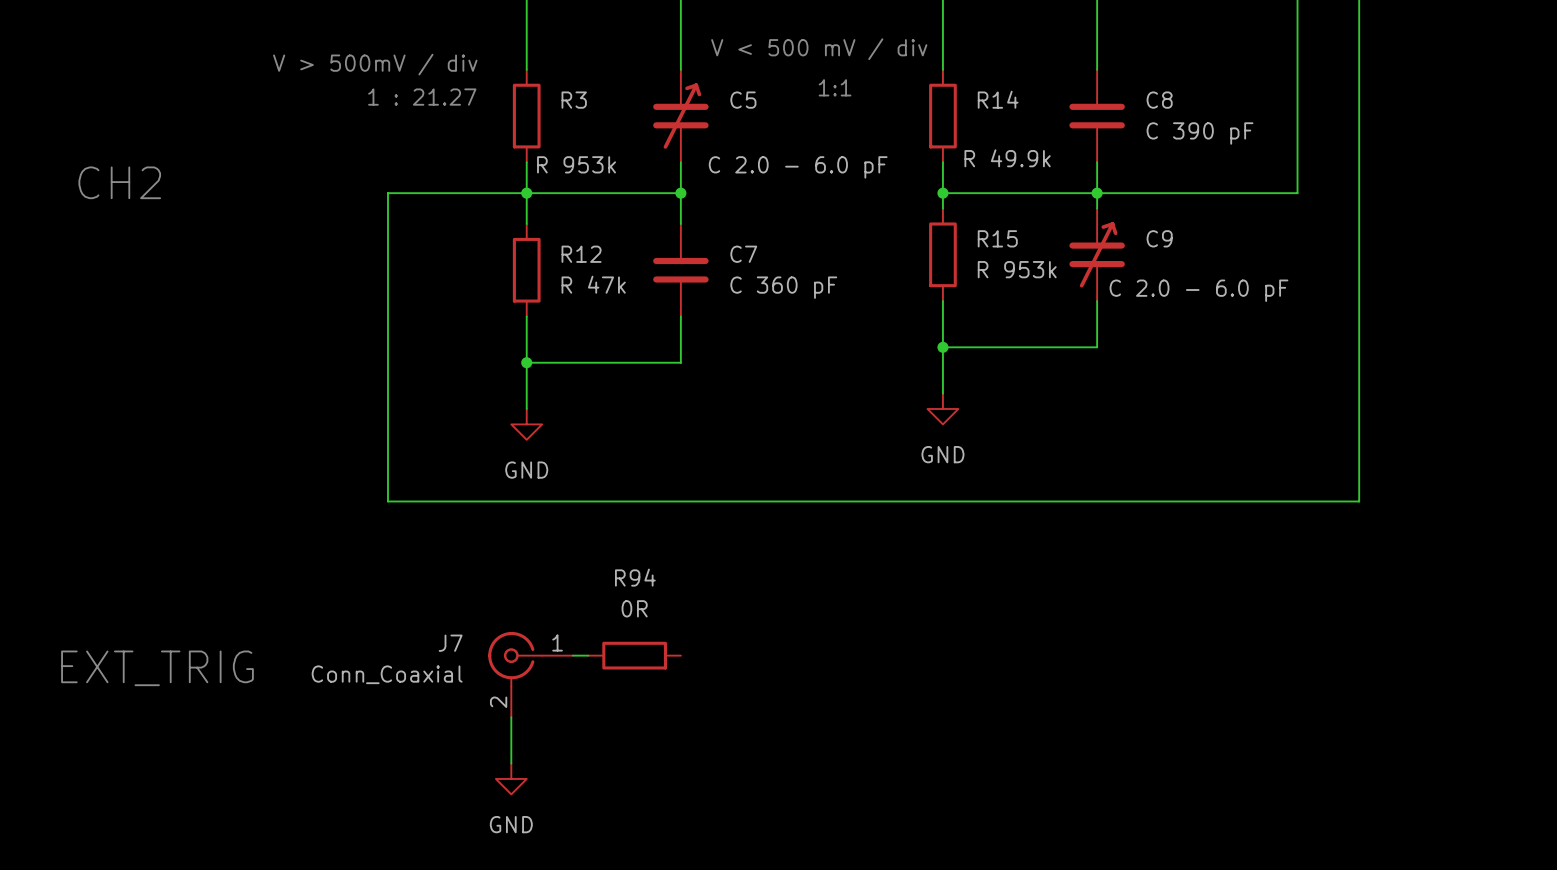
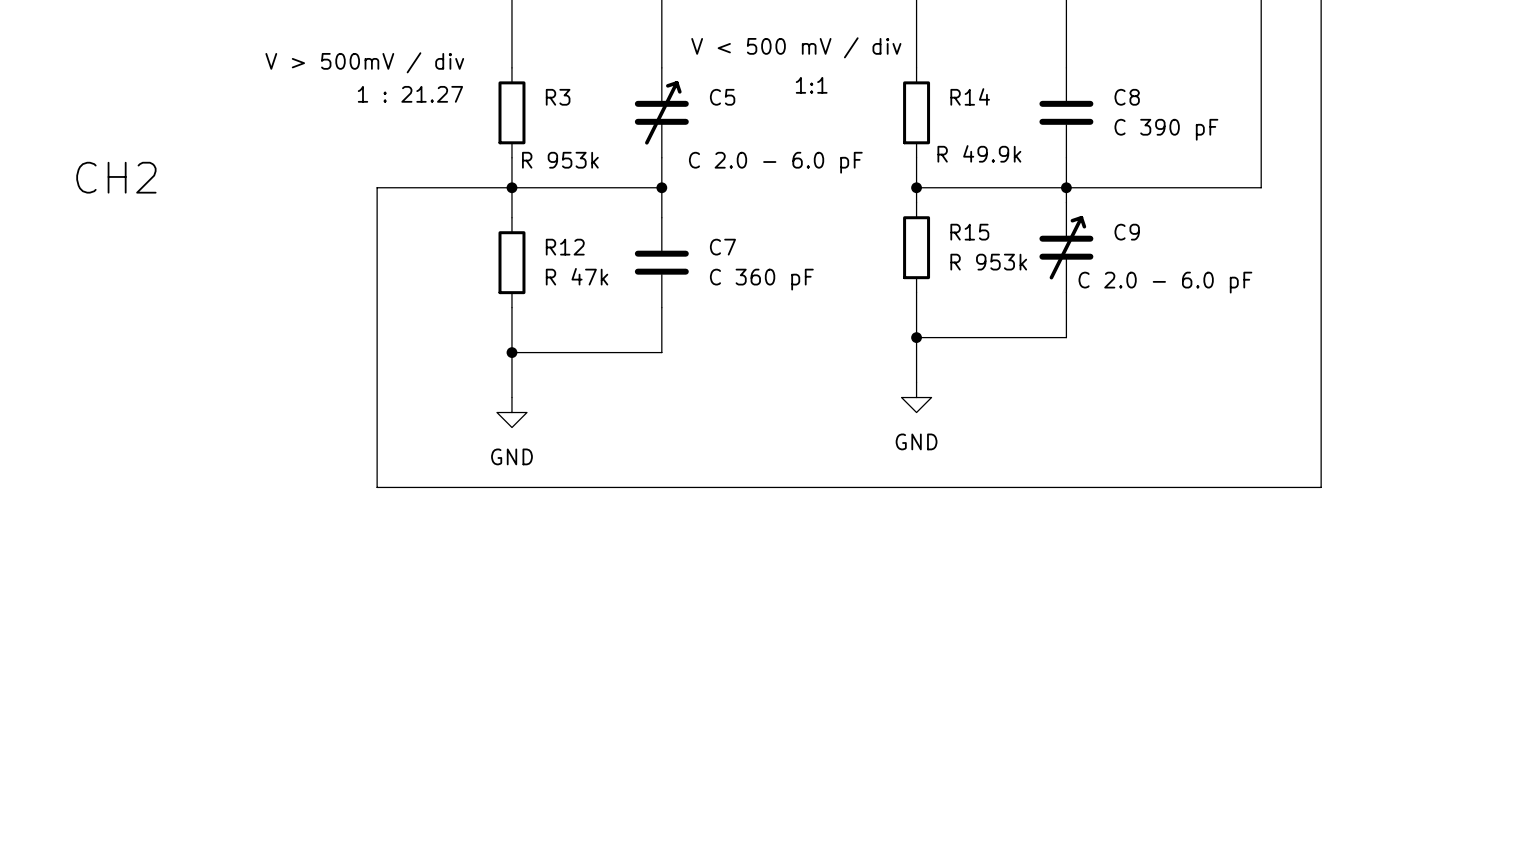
wire: (572, 655) (588, 655) -> none
R94: 0R (634, 655) -> none
text: EXT_TRIG (157, 668) -> none
J7: Conn_Coaxial (530, 674) -> none
wire: (511, 717) (511, 763) -> none
power symbol: GND (511, 778) -> none

